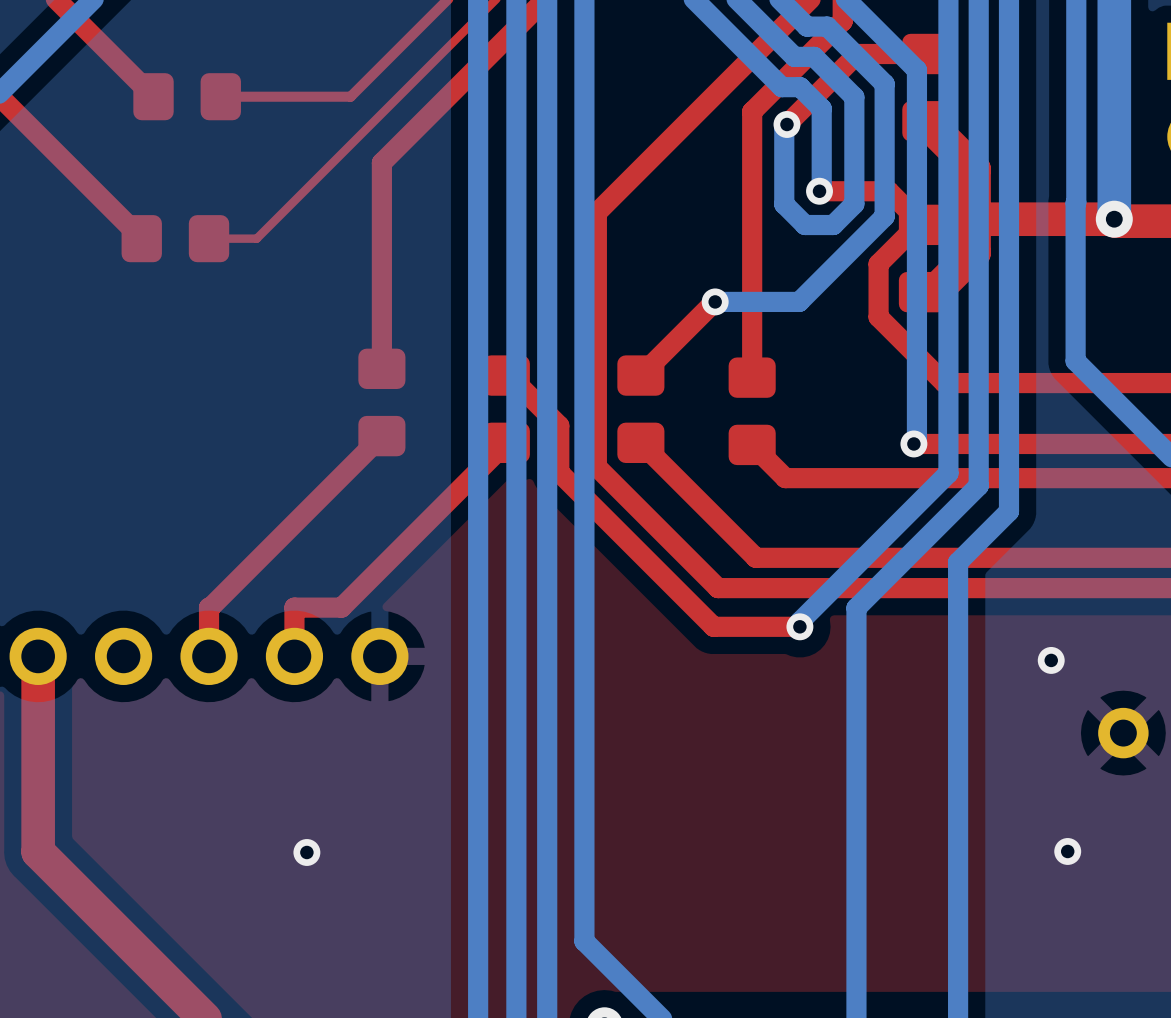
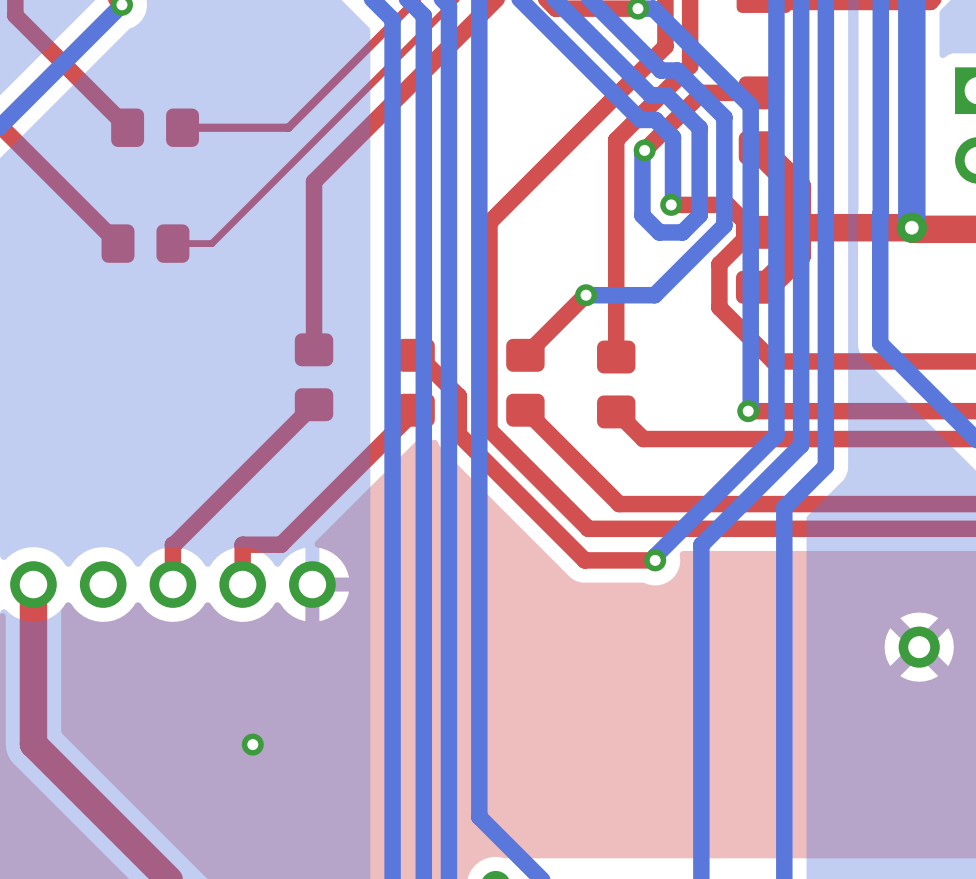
via: (1051, 660) -> none
via: (1067, 851) -> none

